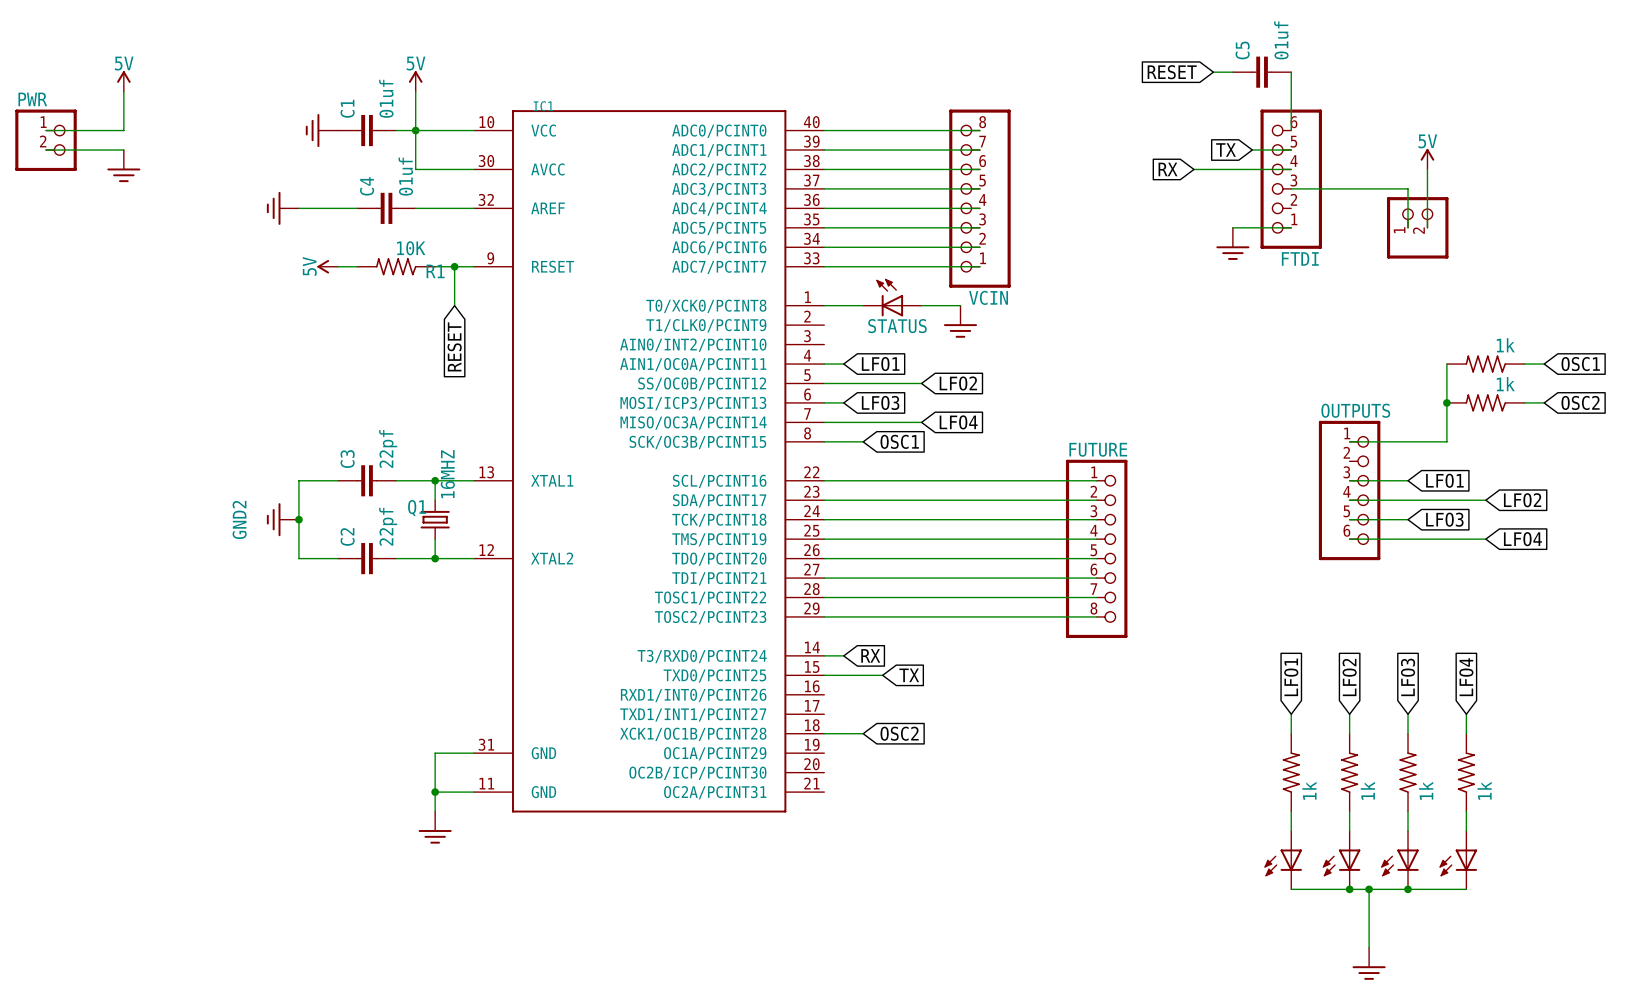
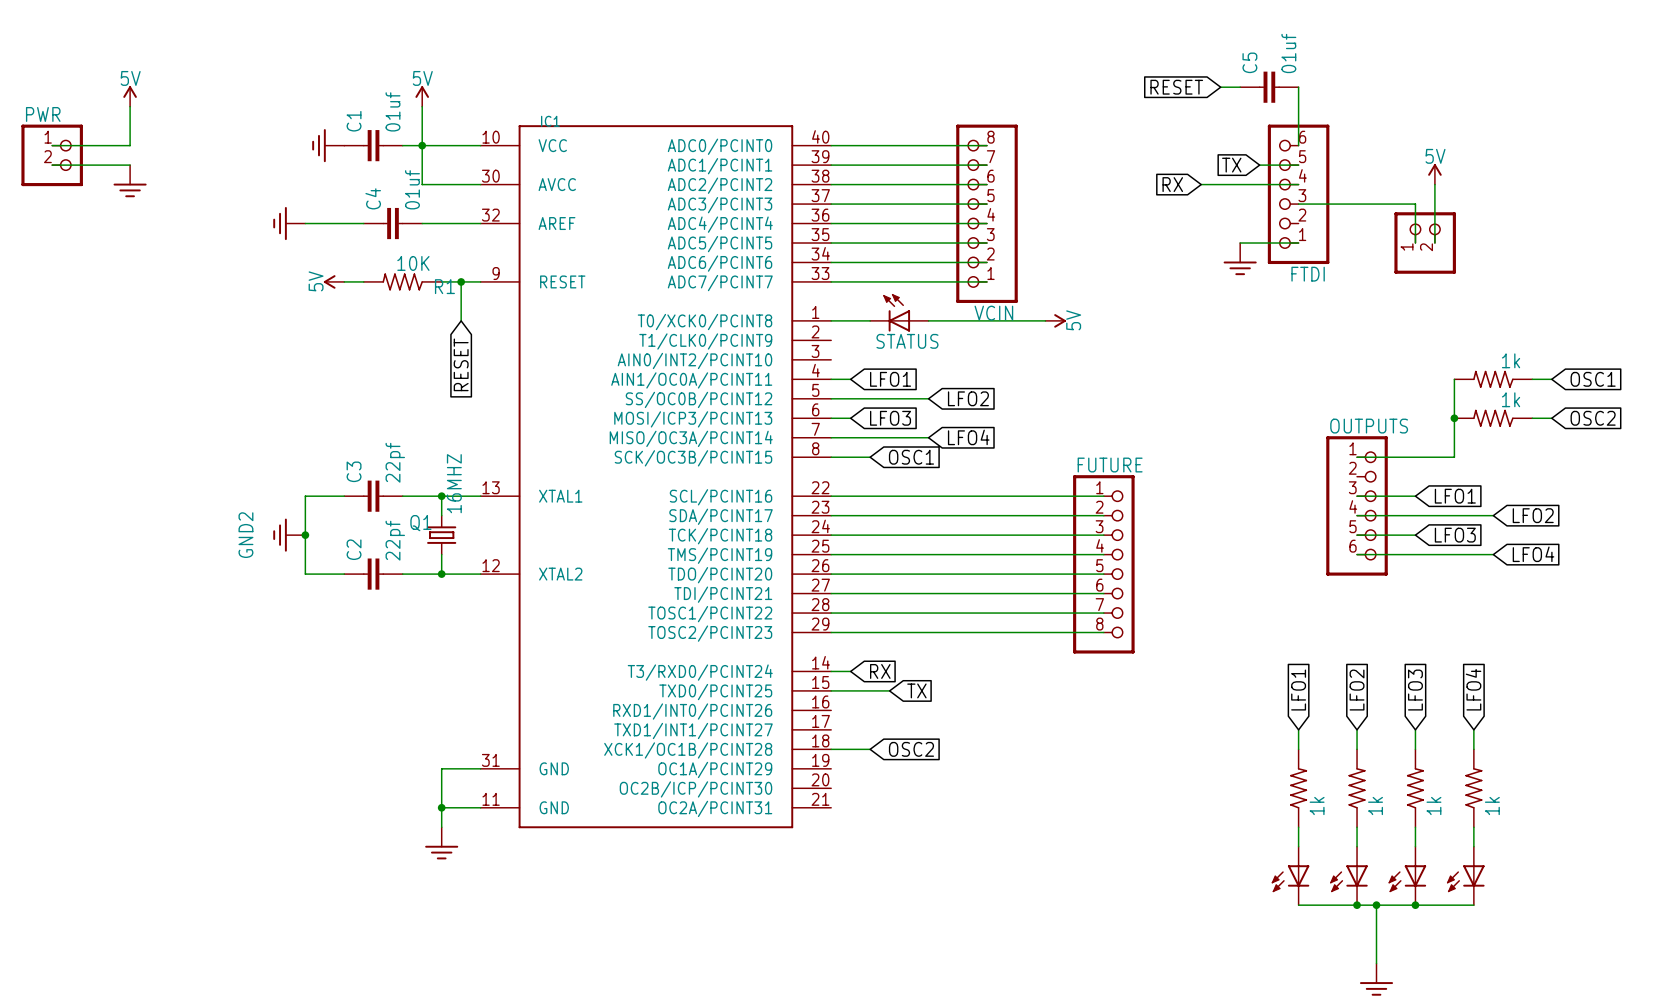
wire: none -> (967, 320) (1045, 320)
power symbol: none -> 5V (1055, 320)
power symbol: (960, 321) -> none

